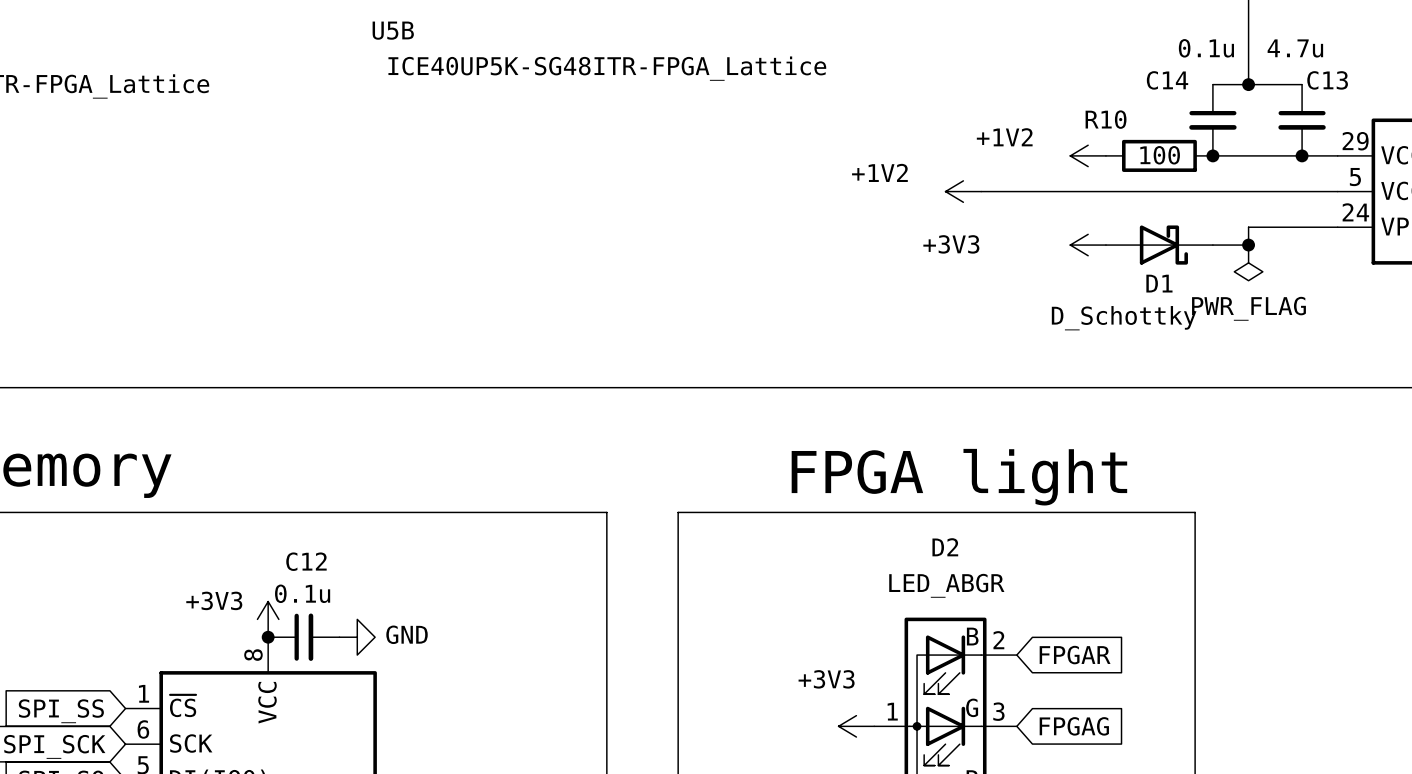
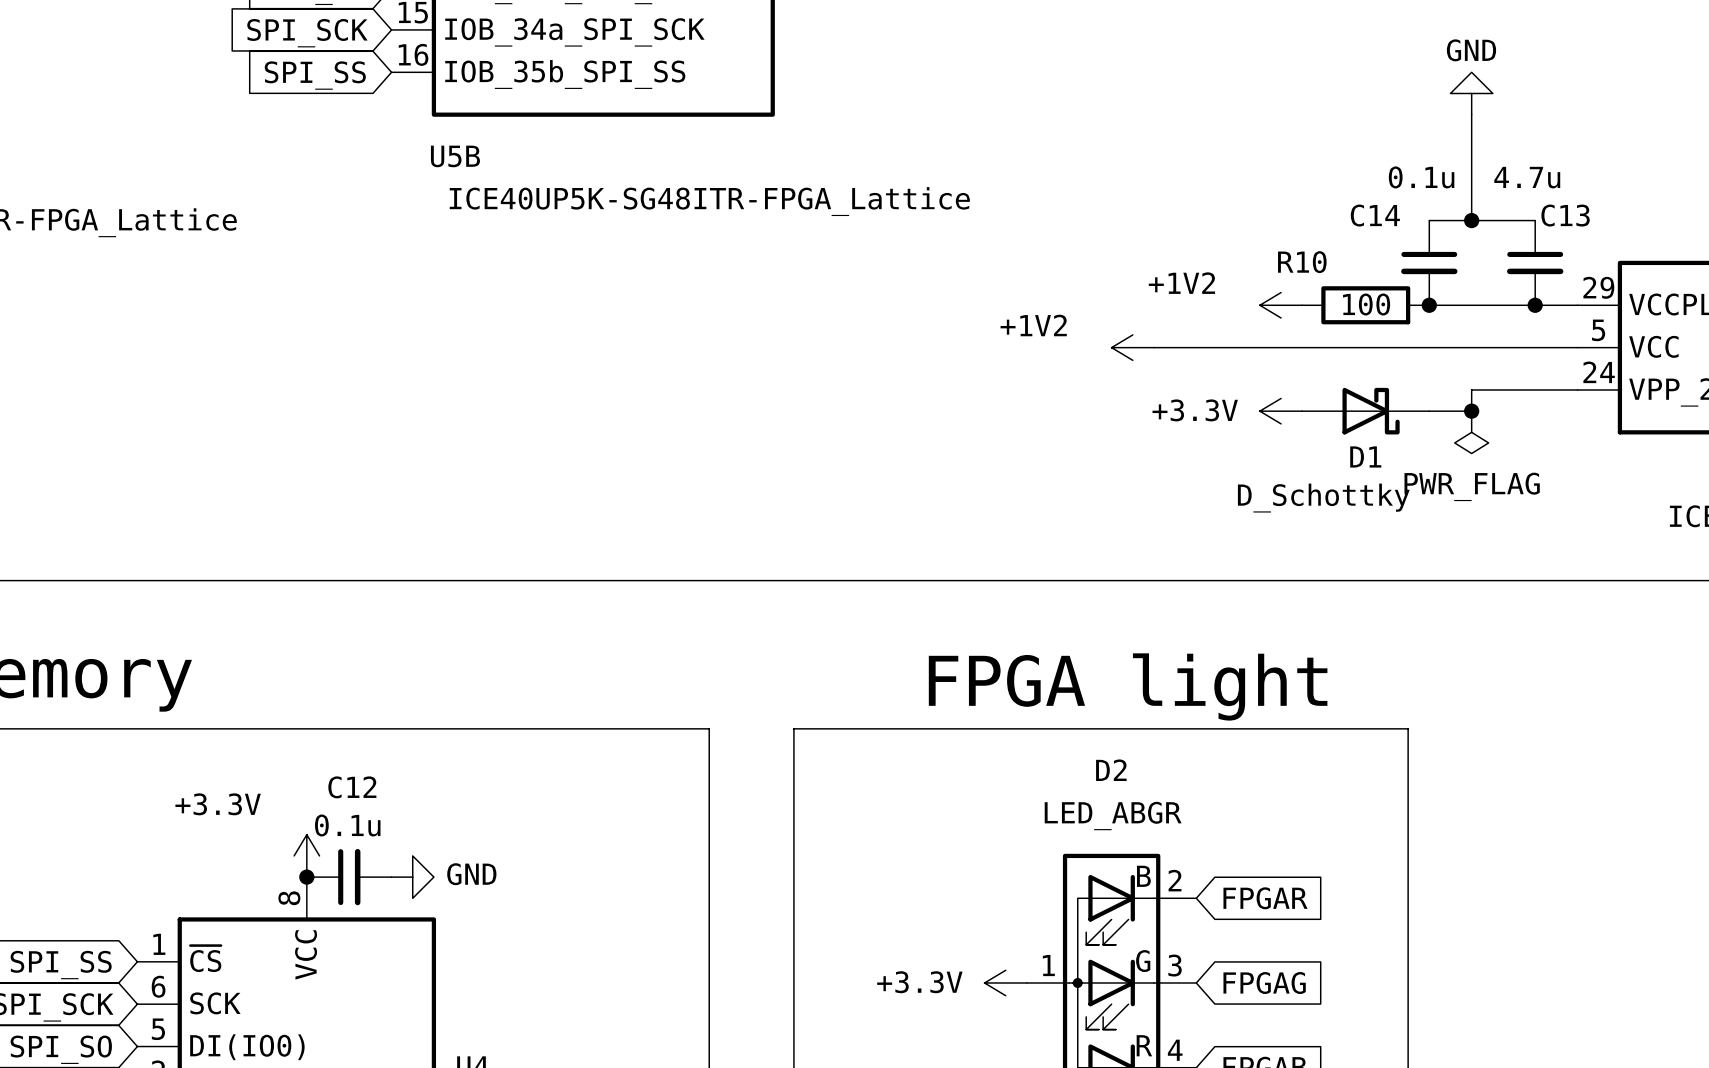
power symbol: +3V3 (1088, 245) -> +3.3V (1281, 411)
power symbol: +3V3 (268, 619) -> +3.3V (306, 855)
power symbol: +3V3 (856, 726) -> +3.3V (1005, 983)

